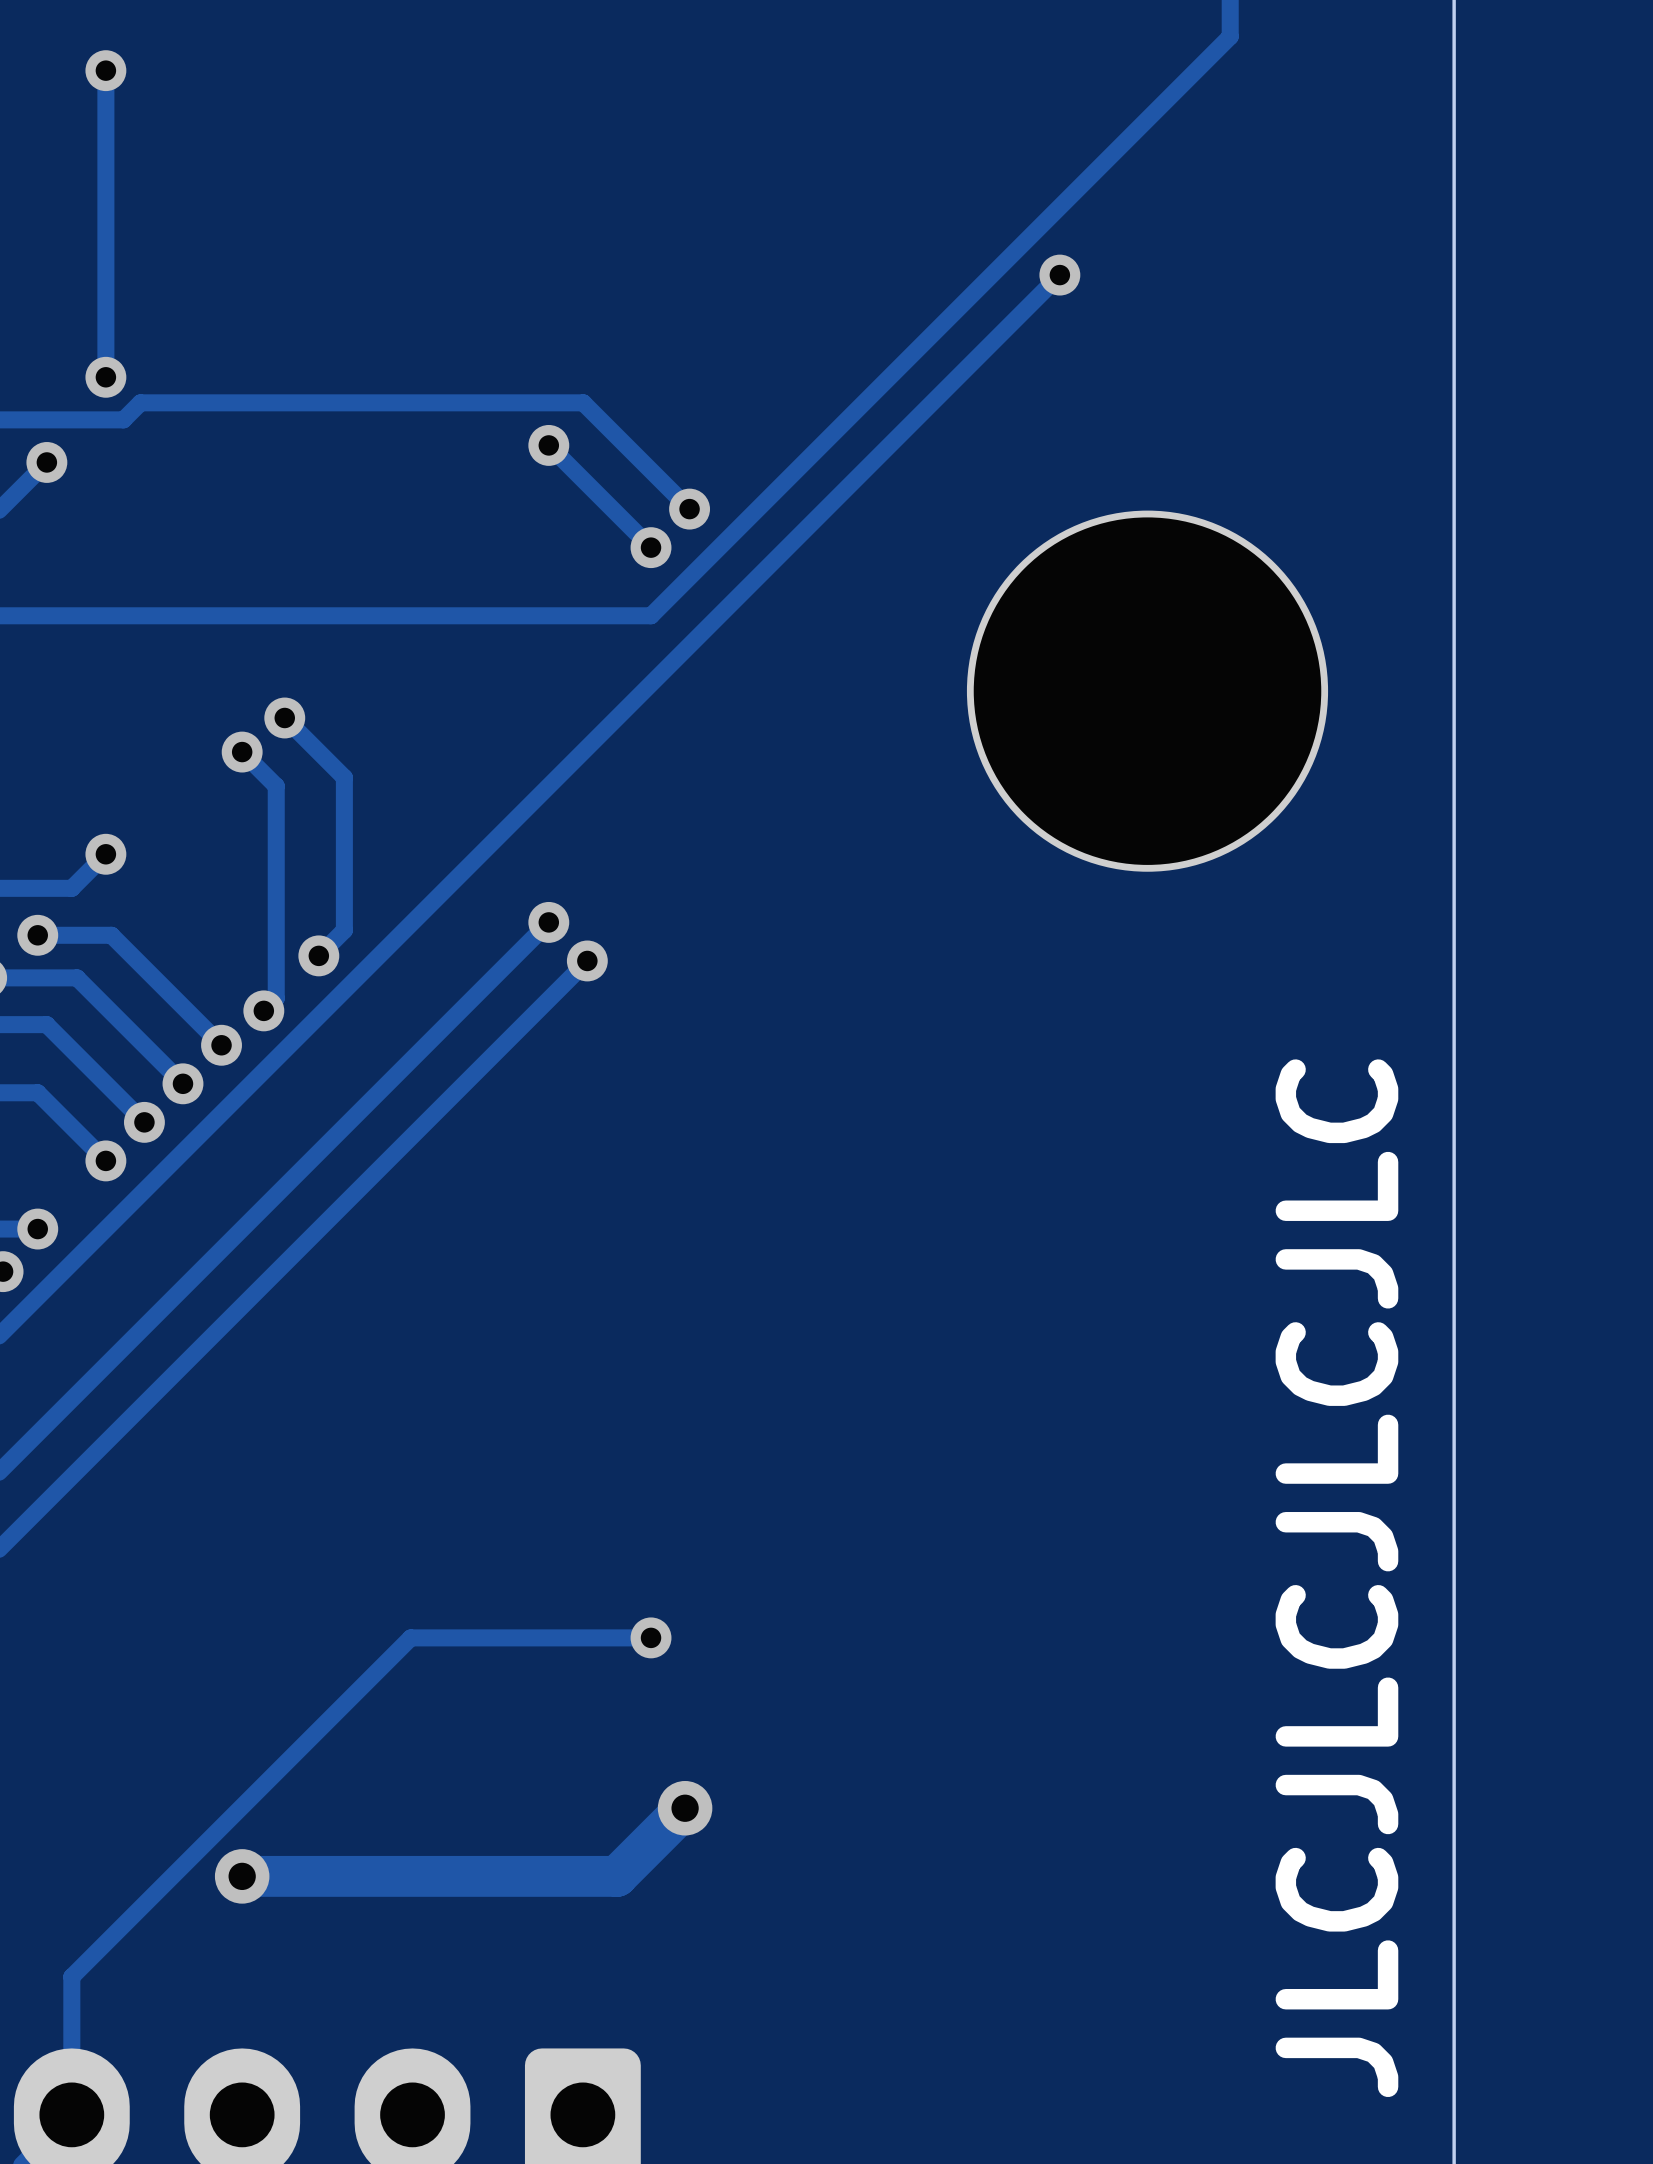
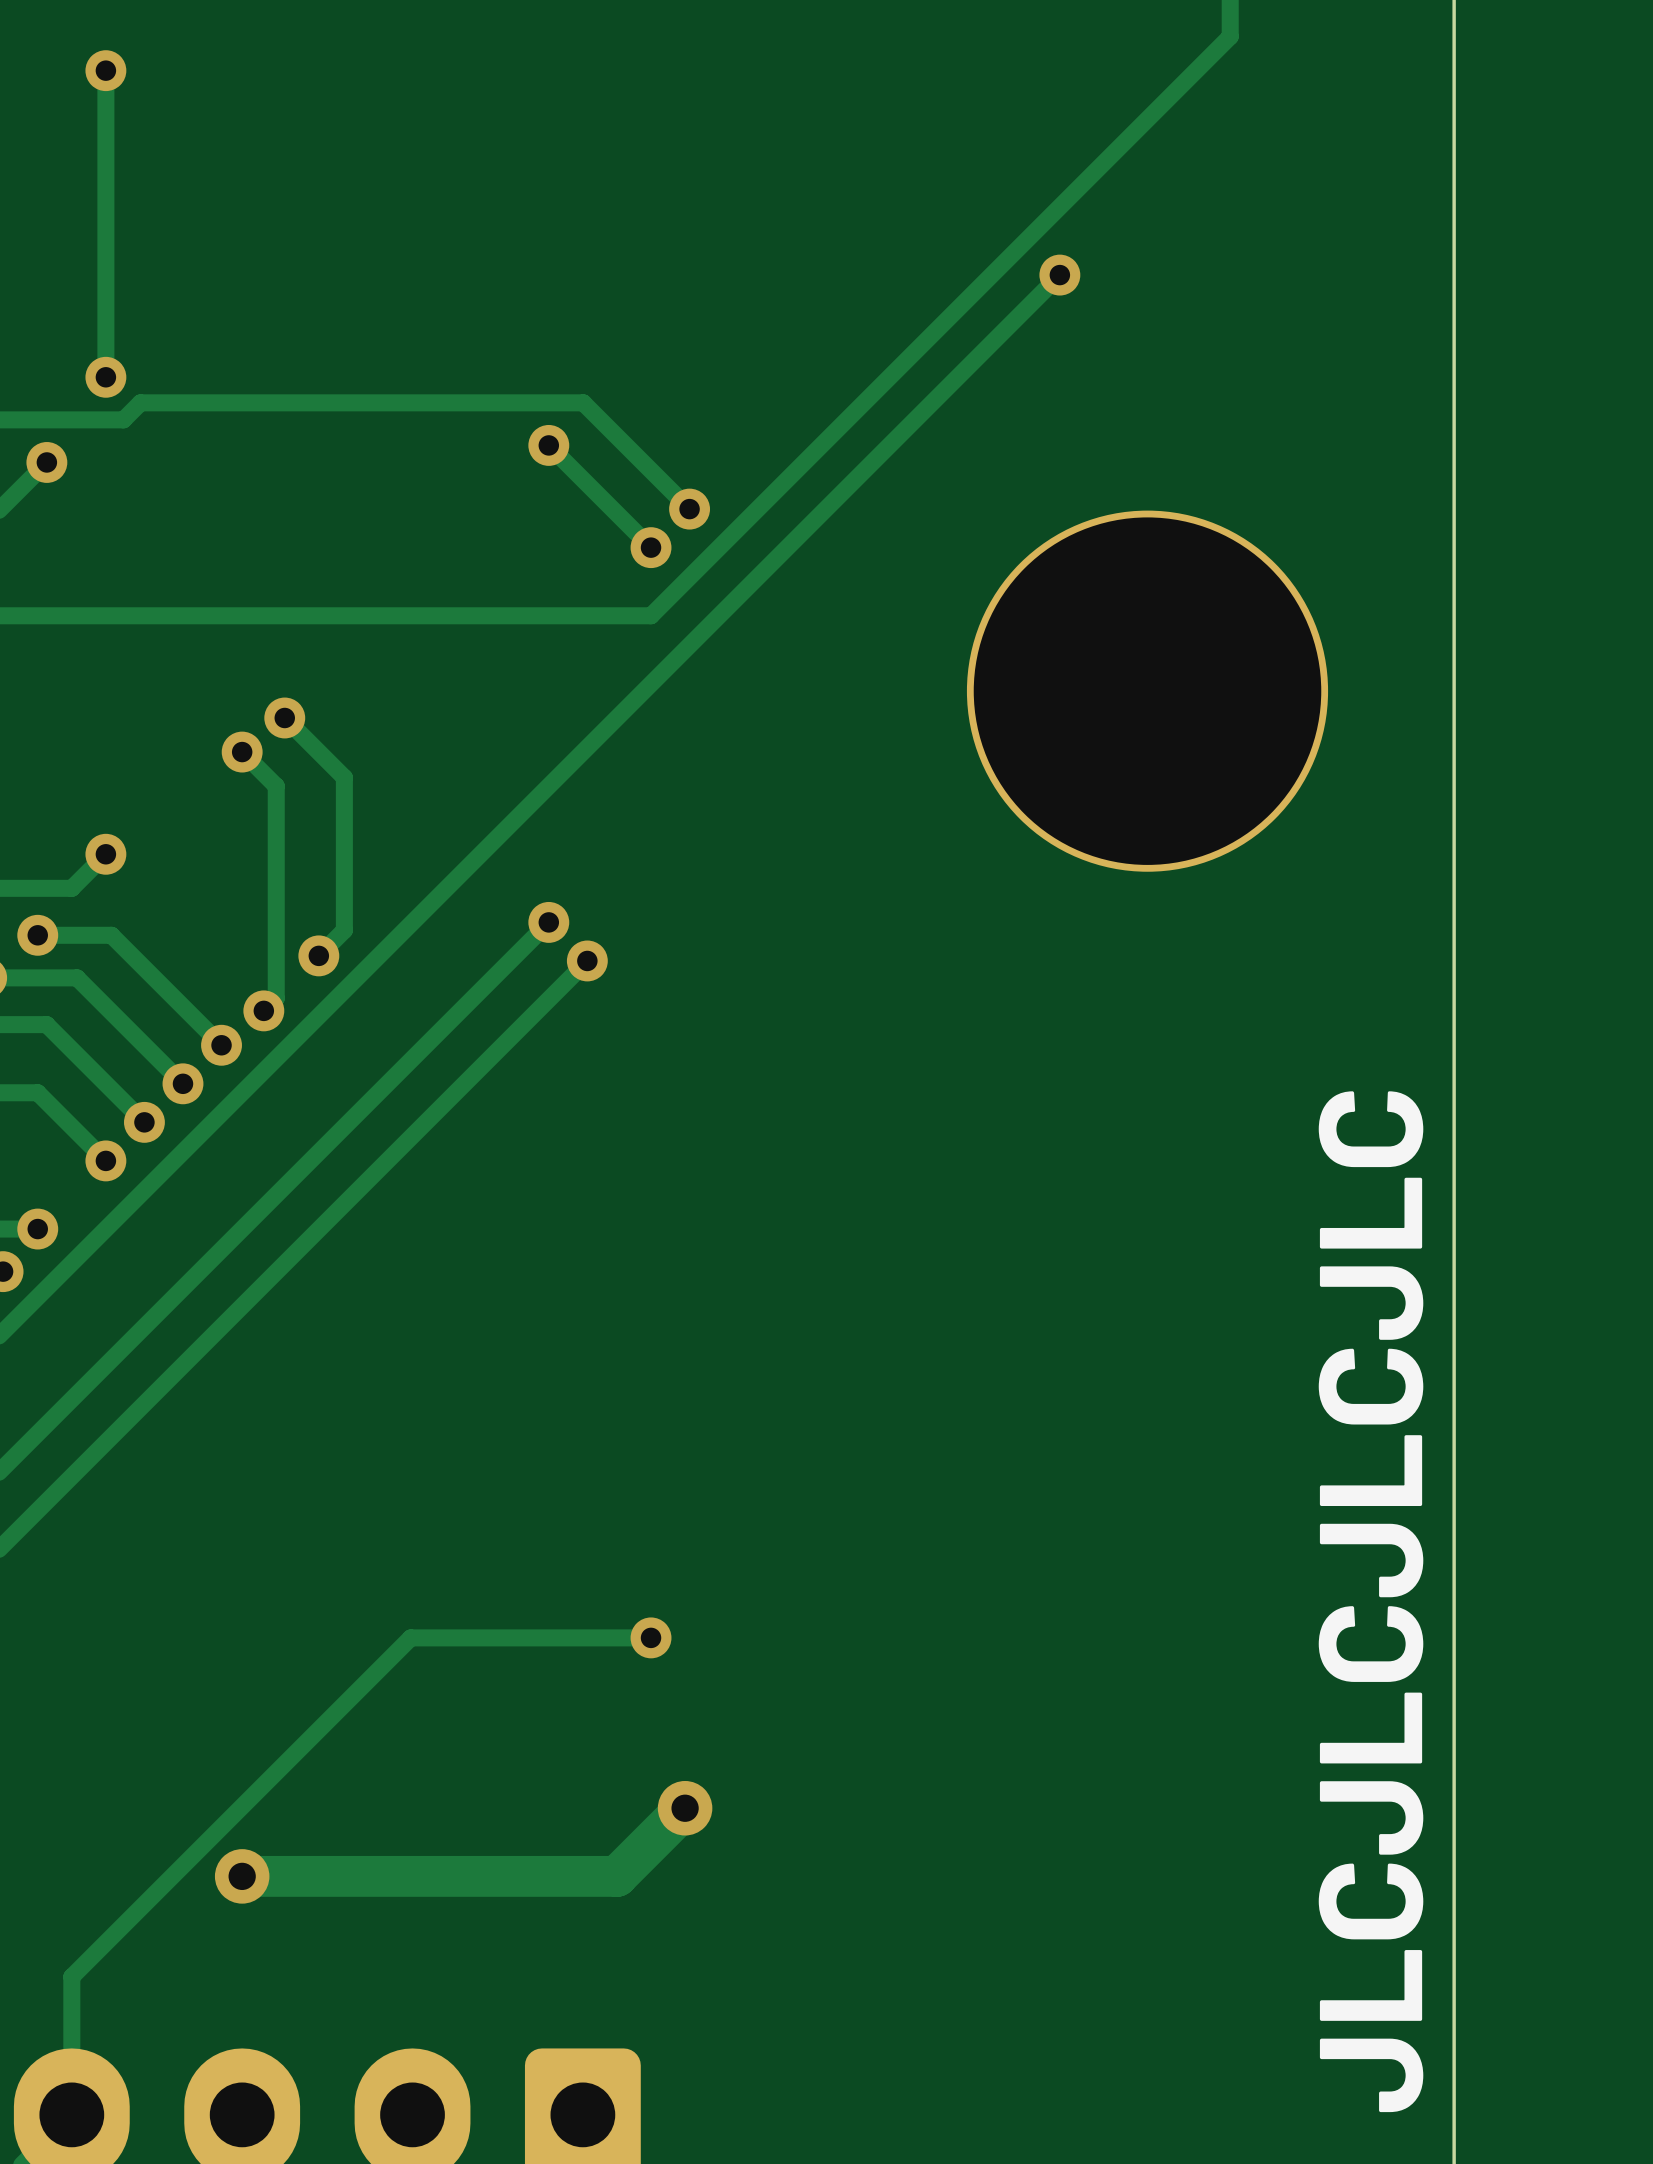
text position: JLCJLCJLCJLC (1336, 1578) -> JLCJLCJLCJLC (1371, 1601)

